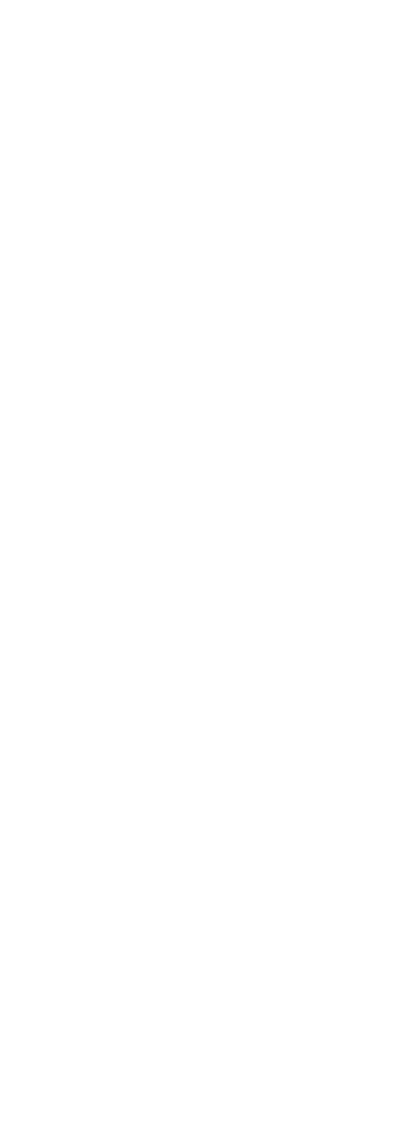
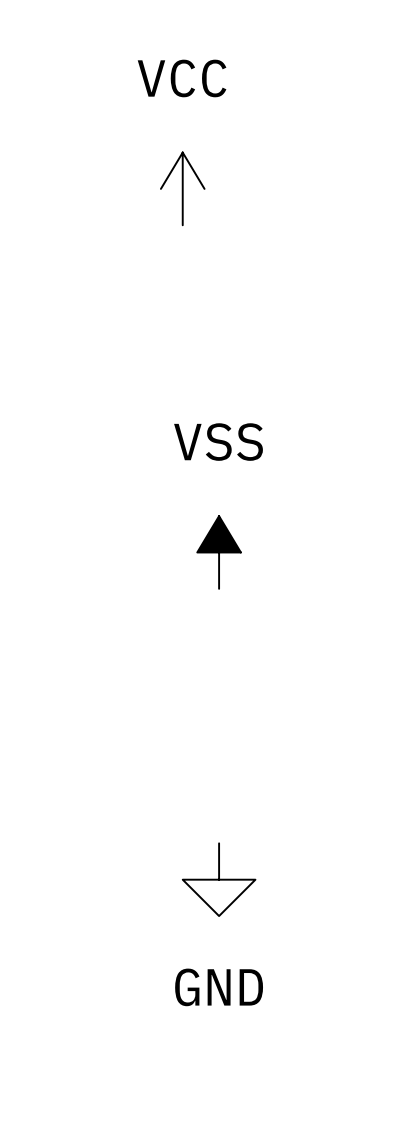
power symbol: none -> VCC (182, 188)
power symbol: none -> VSS (219, 552)
power symbol: none -> GND (219, 879)

